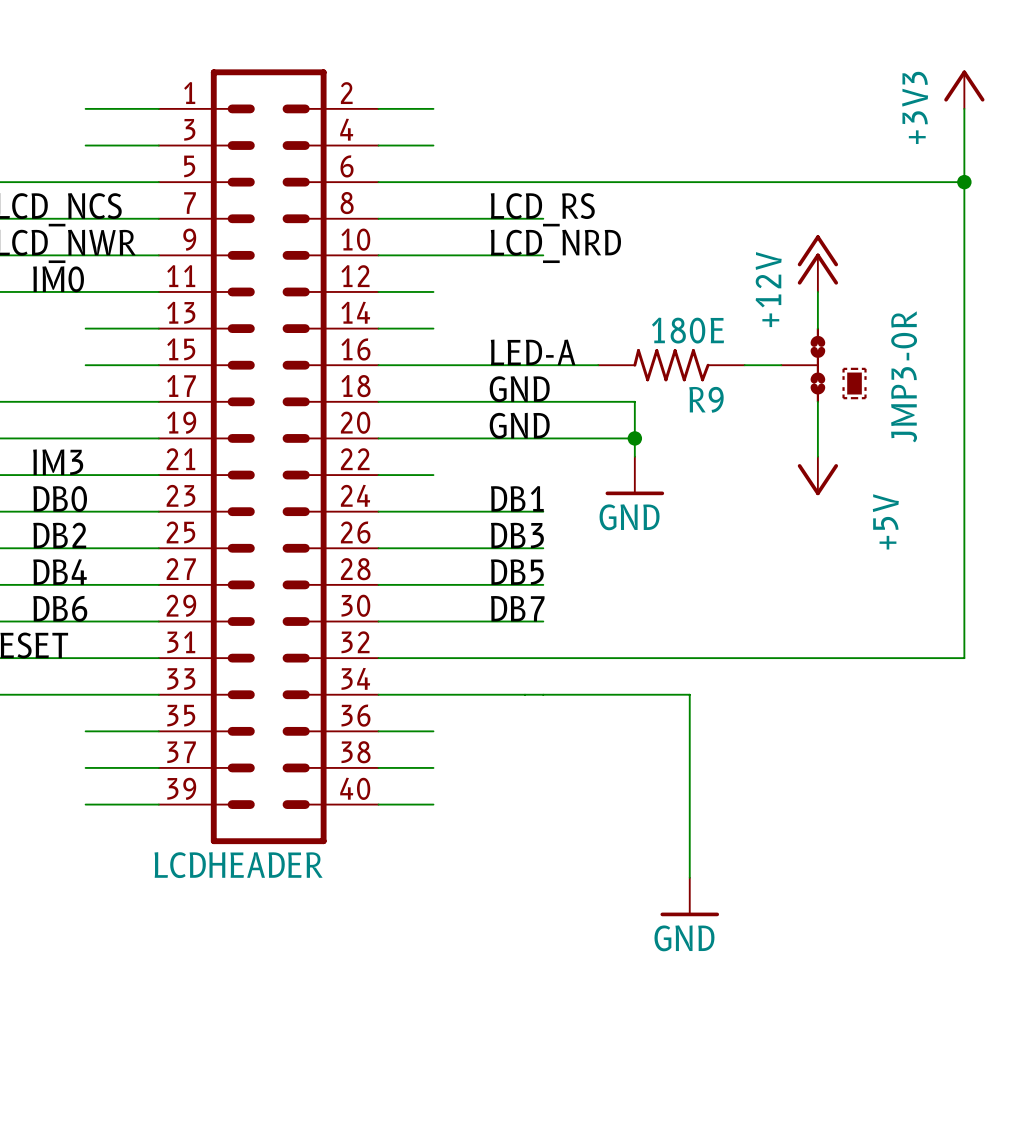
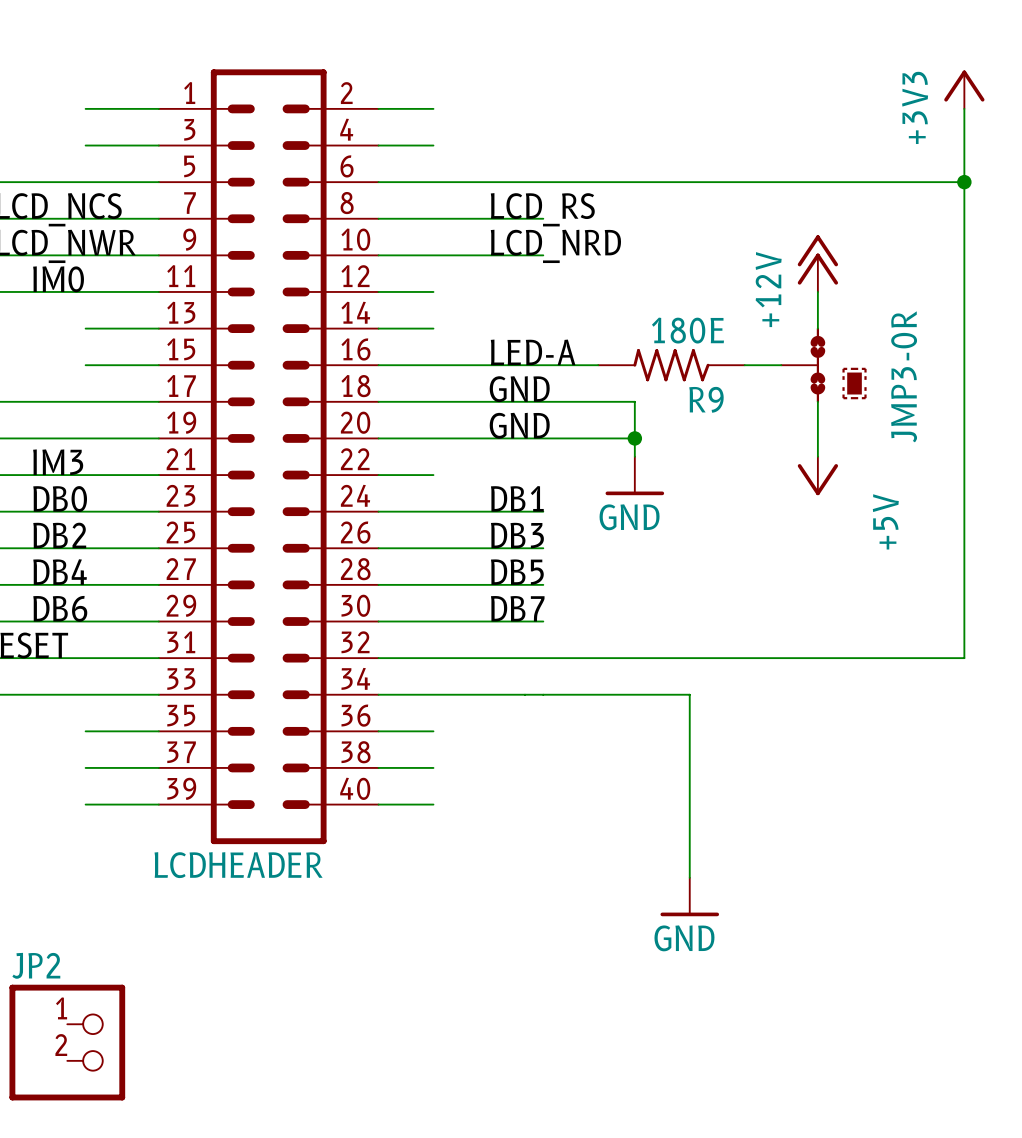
JP2: none -> (67, 1042)

